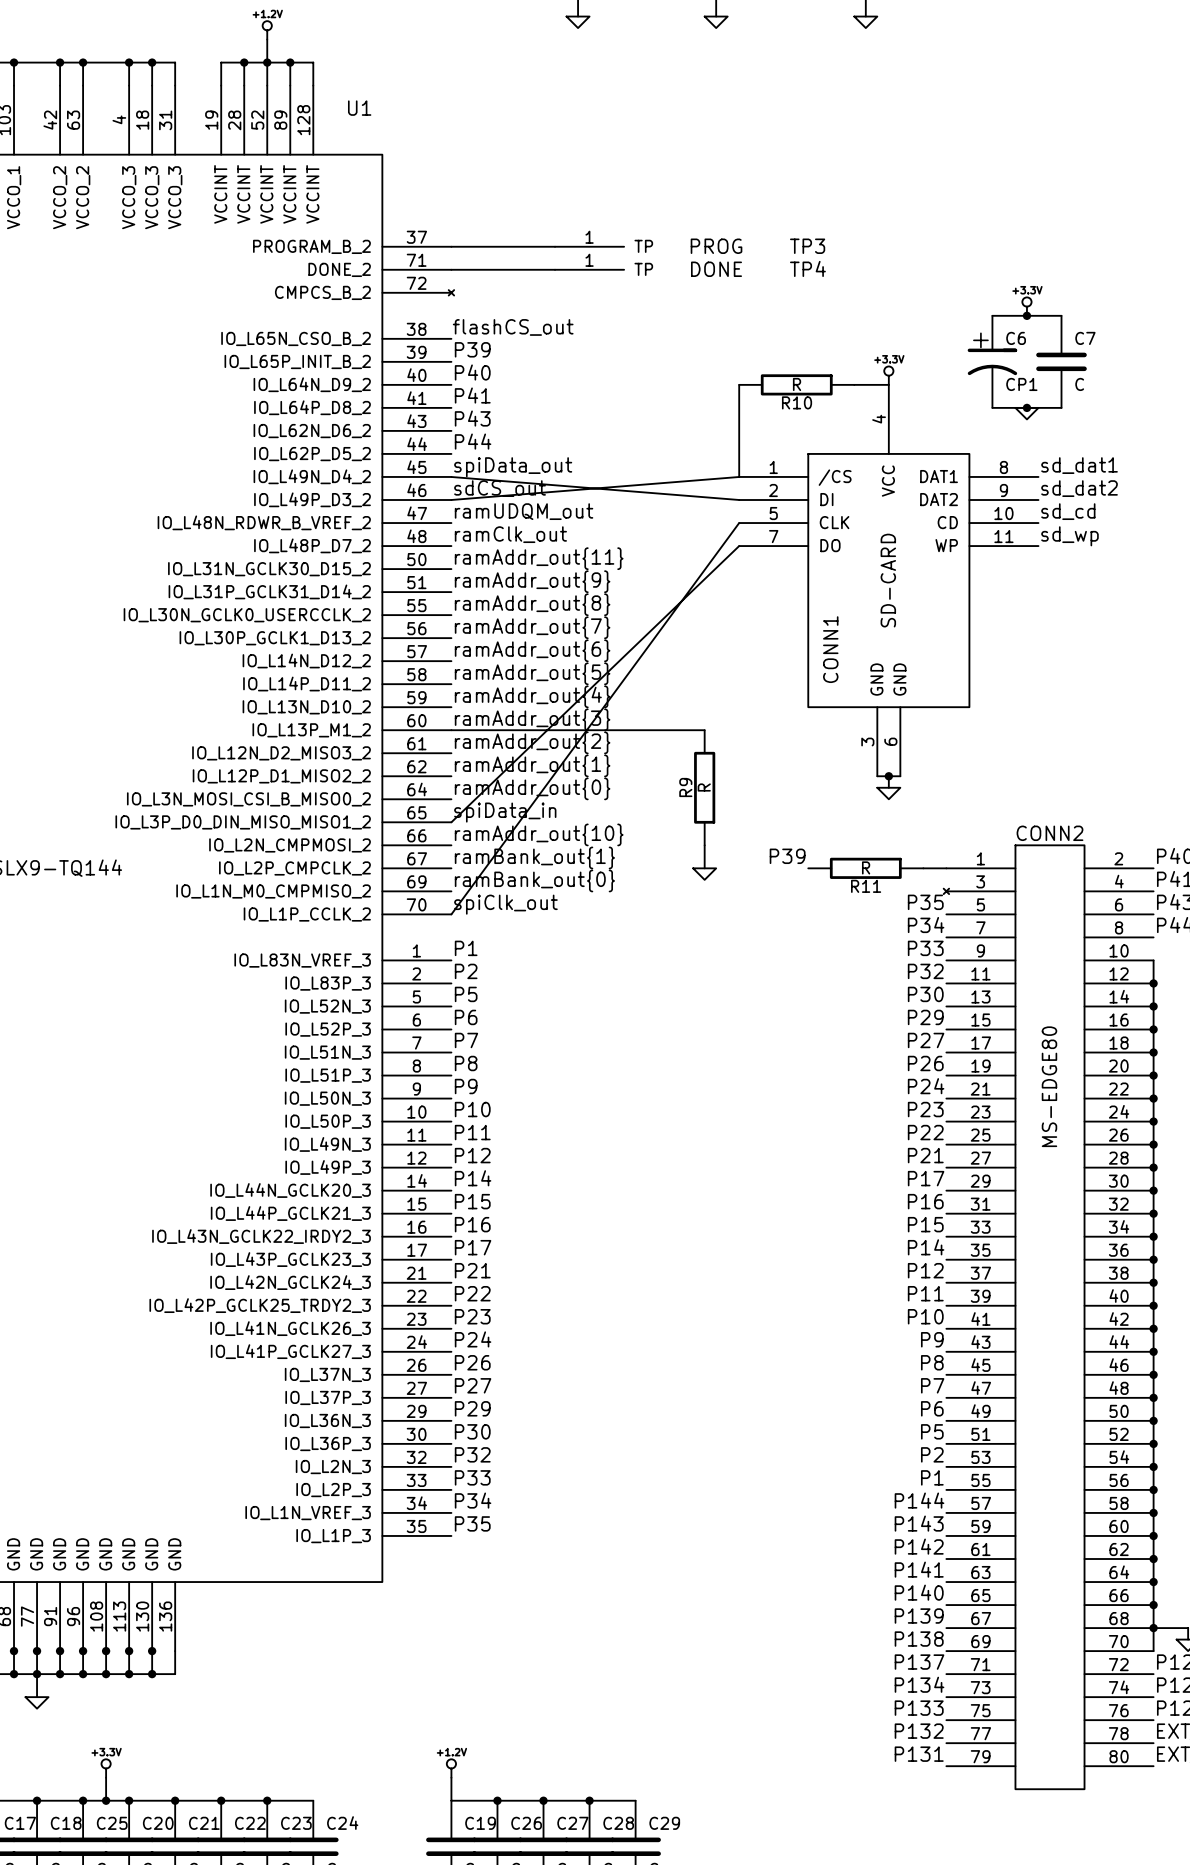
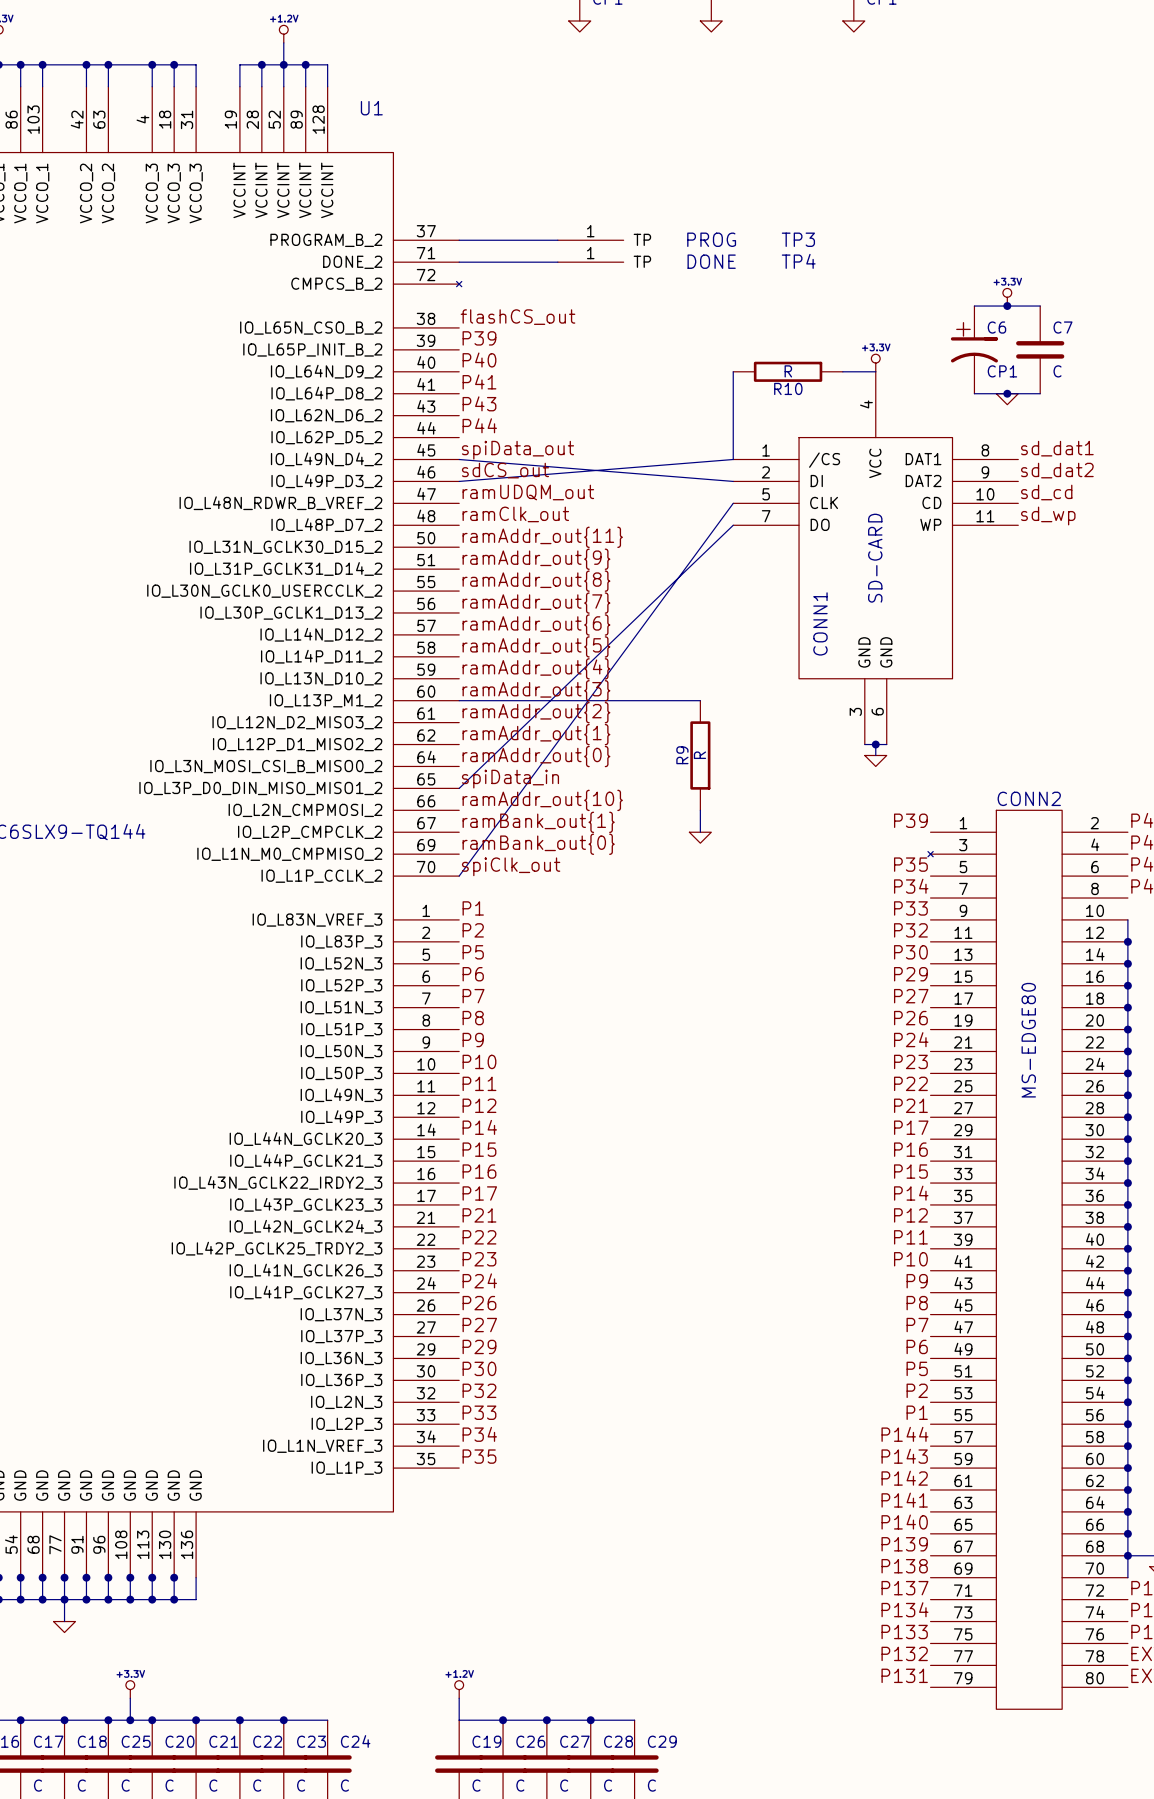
label position: P39 (787, 856) -> P39 (910, 820)
R11: R (865, 868) -> none
wire: (923, 868) (946, 868) -> none

